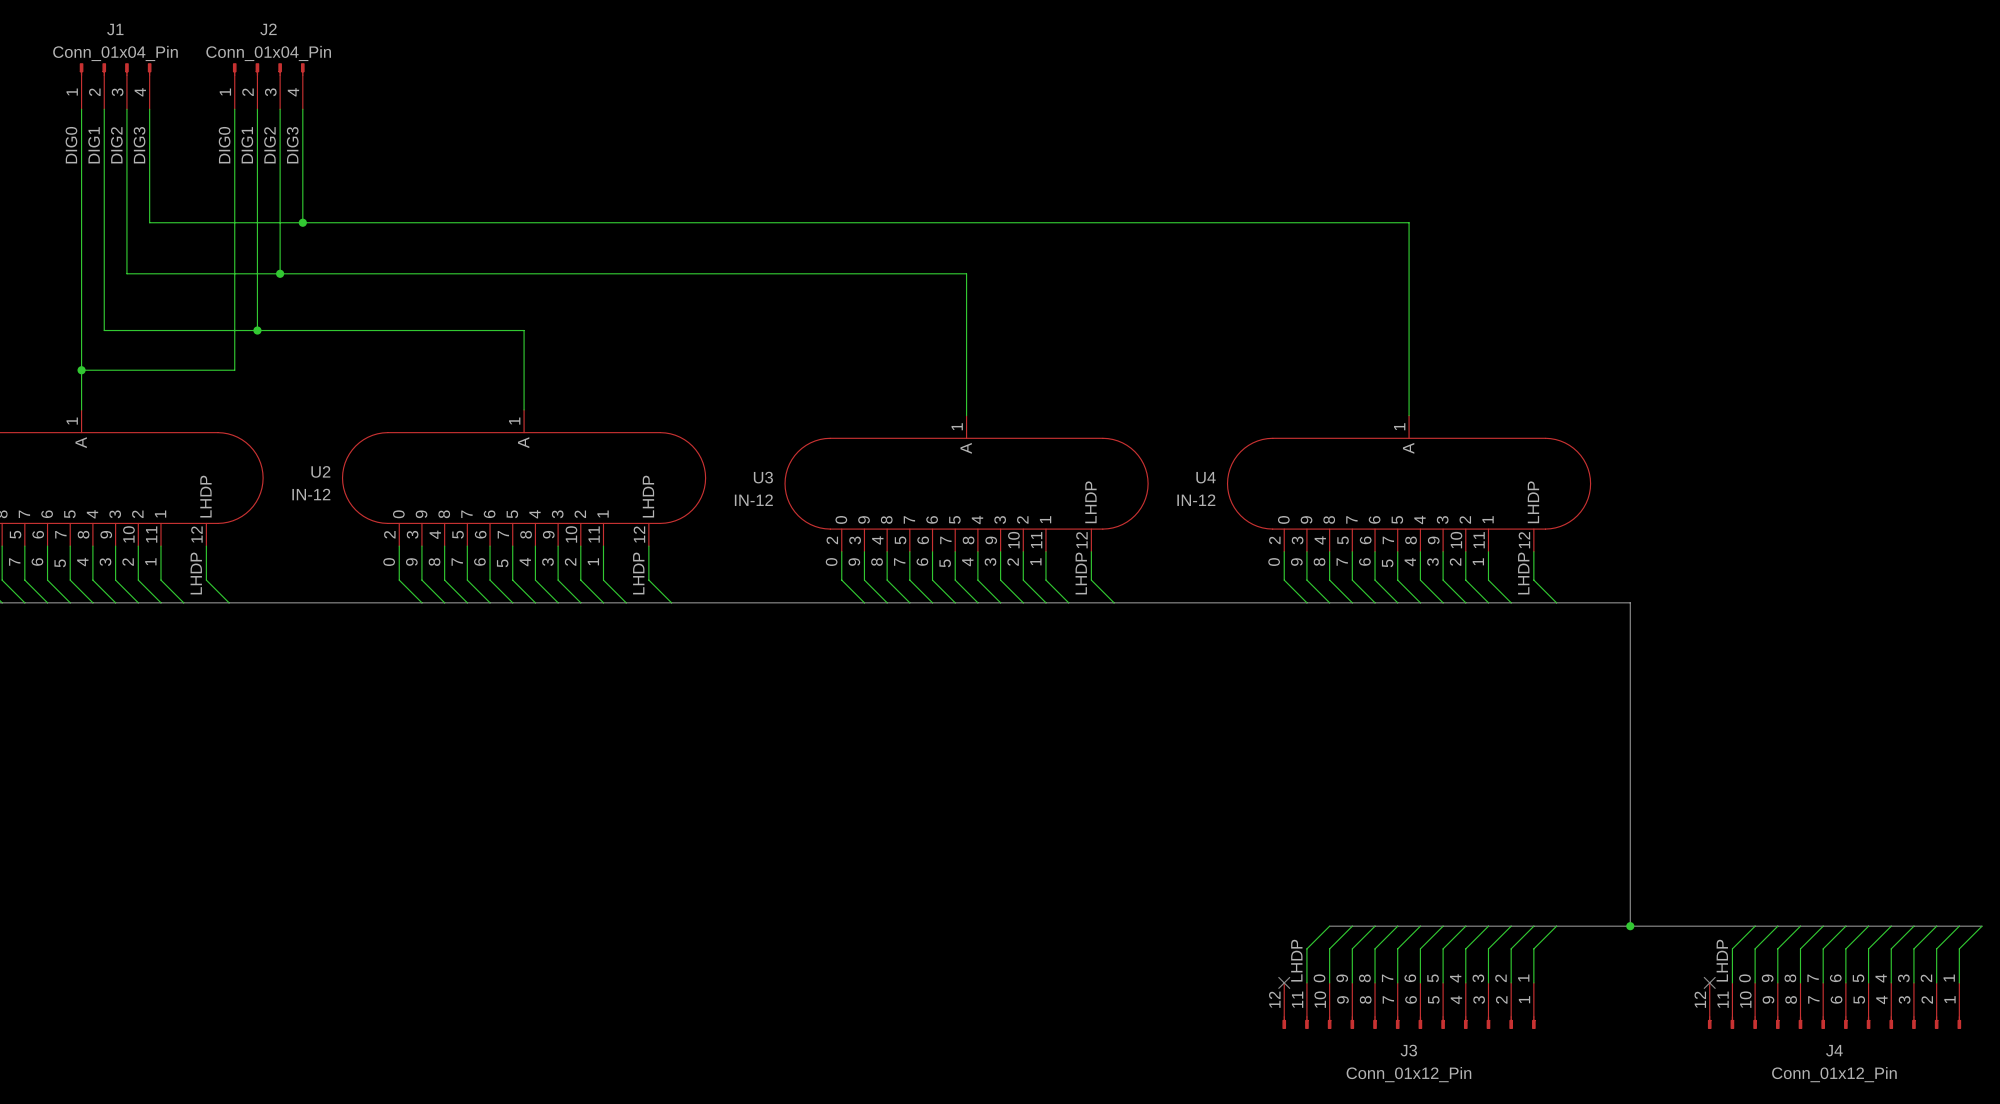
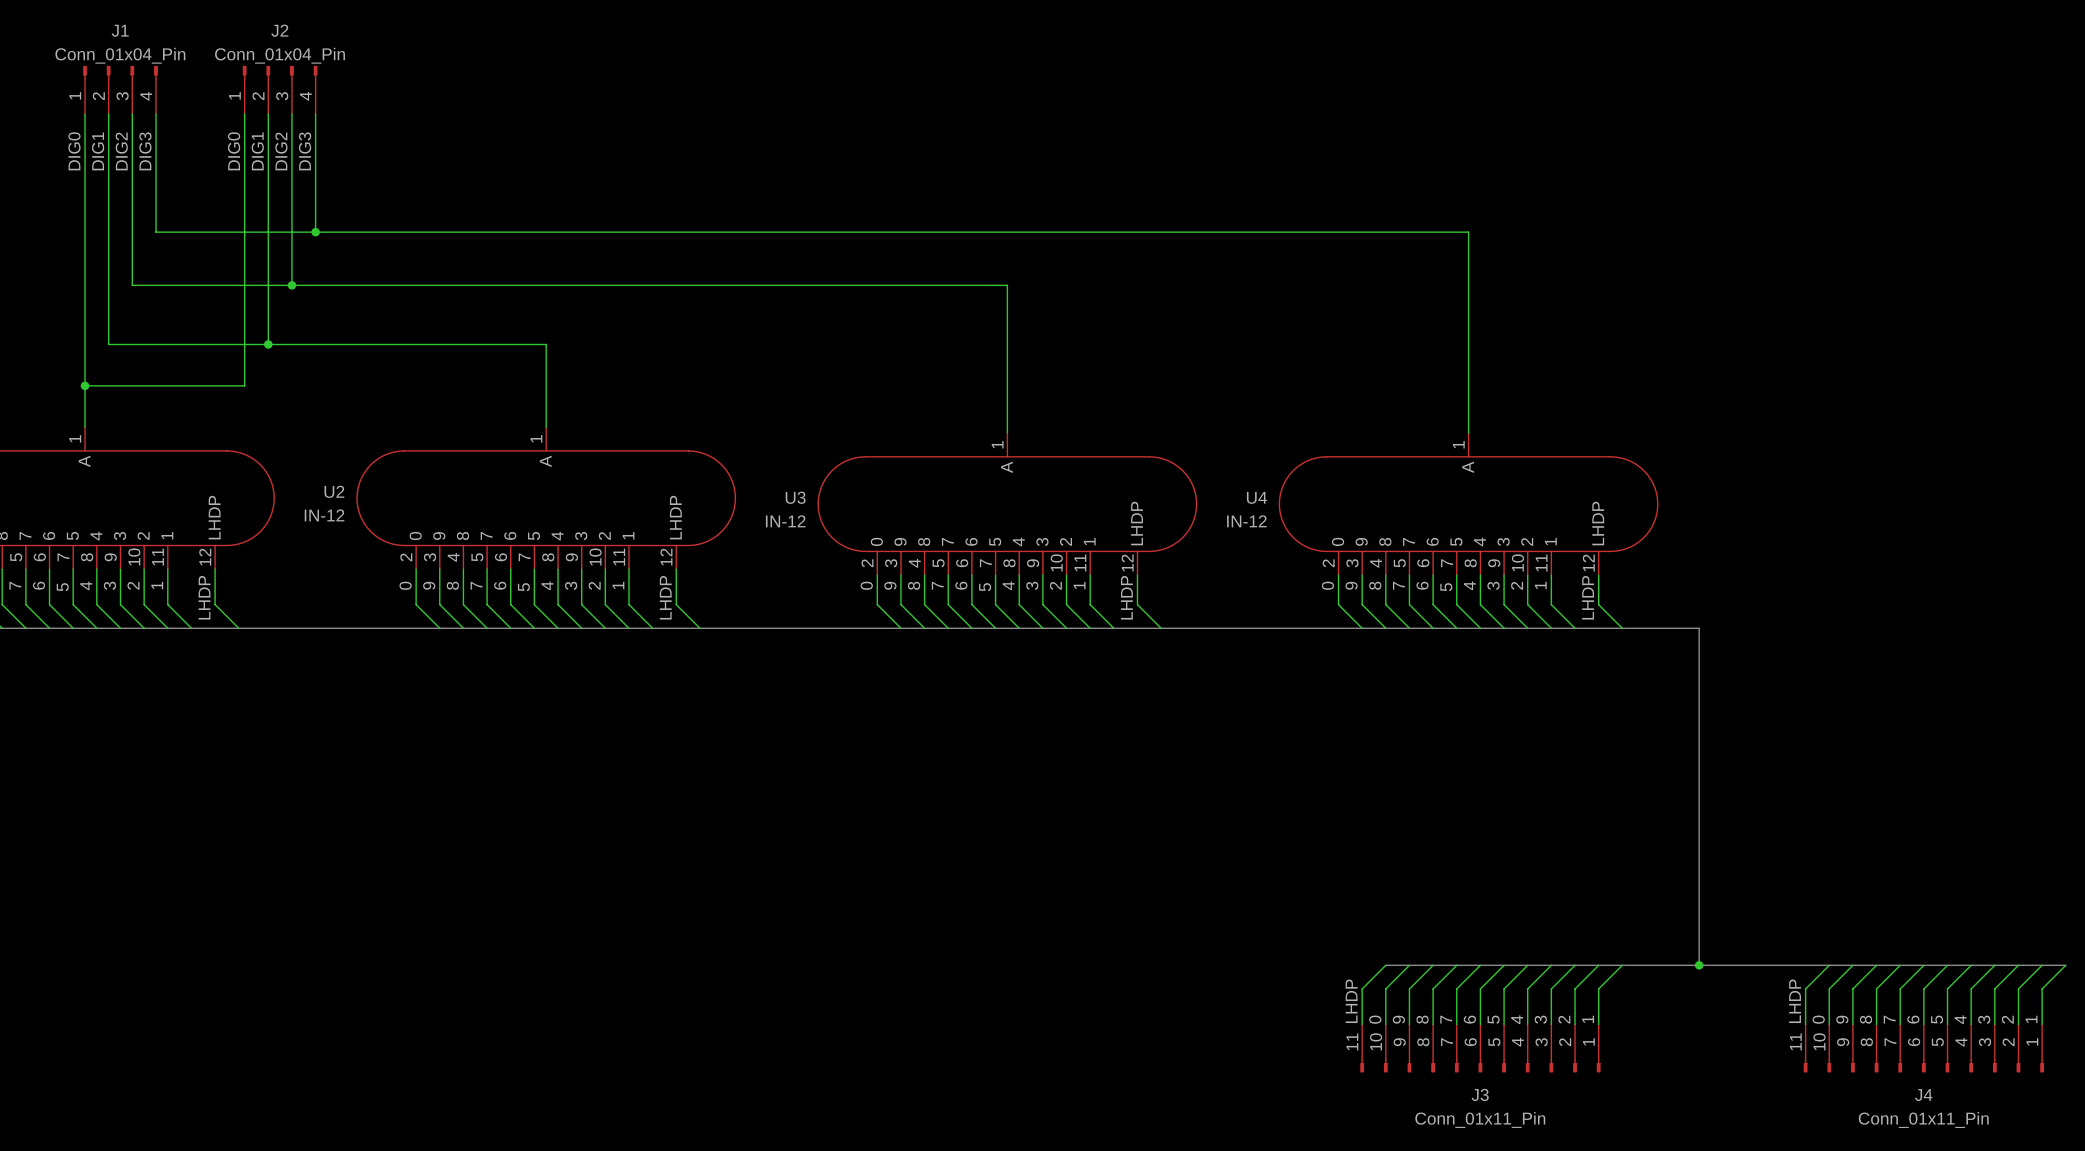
J3 symbol: [1282, 982, 1536, 1029] -> [1360, 1024, 1601, 1073]
no-connect mark: (1284, 982) -> none
J4 symbol: [1707, 982, 1962, 1029] -> [1803, 1024, 2045, 1073]
no-connect mark: (1709, 982) -> none
J3 value: Conn_01x12_Pin (1408, 1074) -> Conn_01x11_Pin (1480, 1120)
J4 value: Conn_01x12_Pin (1834, 1074) -> Conn_01x11_Pin (1923, 1120)

